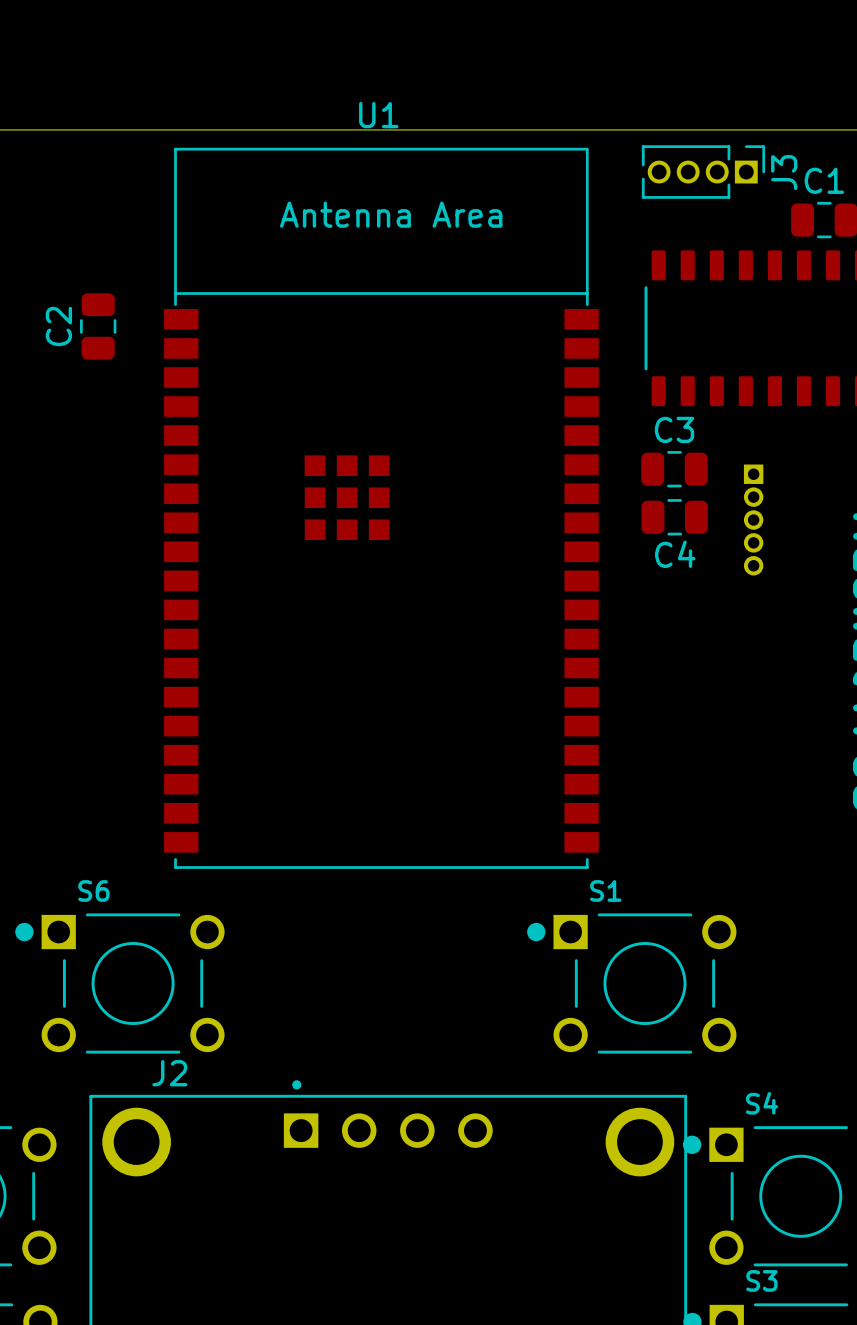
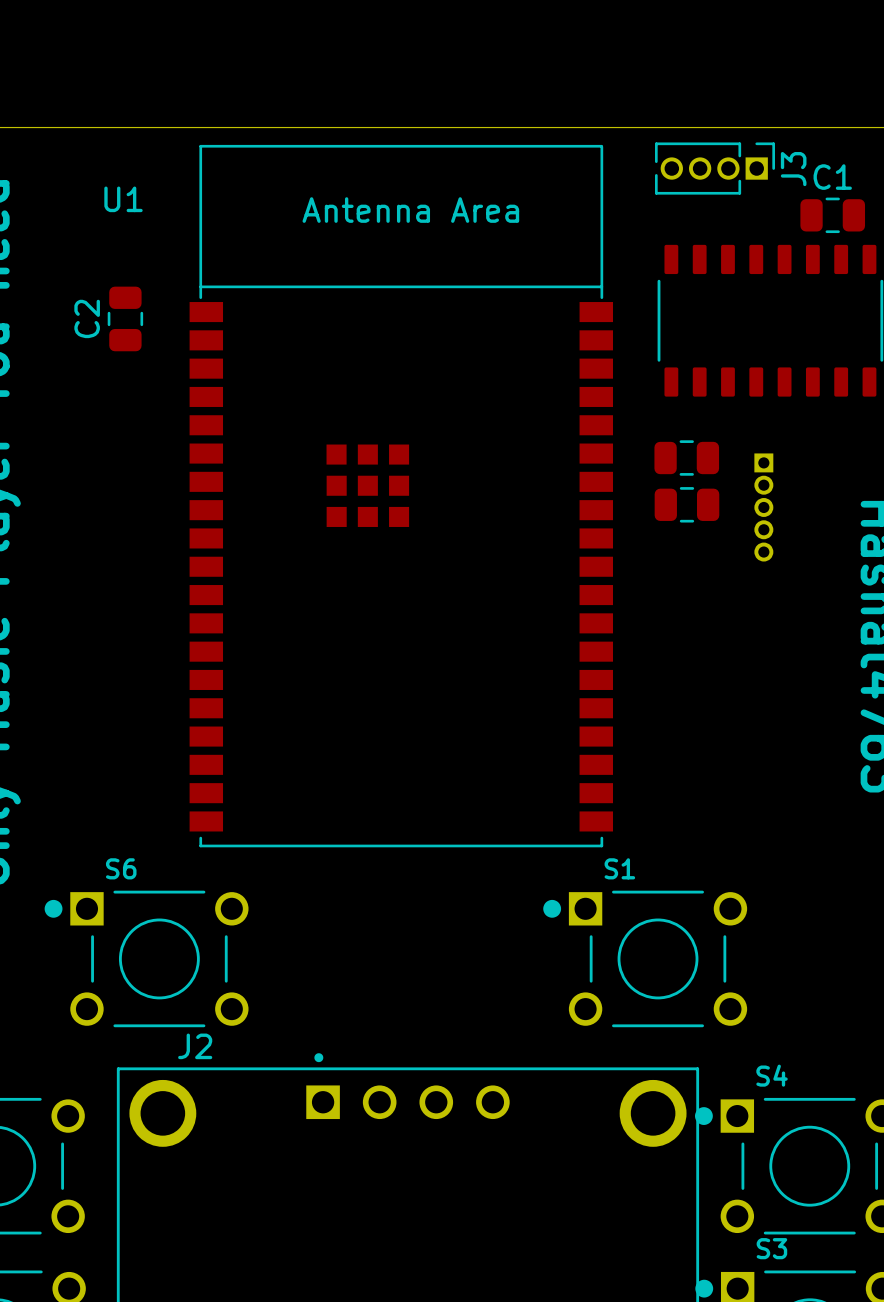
U1 name position: U1 (378, 115) -> U1 (123, 199)
C3 name: C3 (674, 429) -> none
C4 name: C4 (675, 554) -> none

